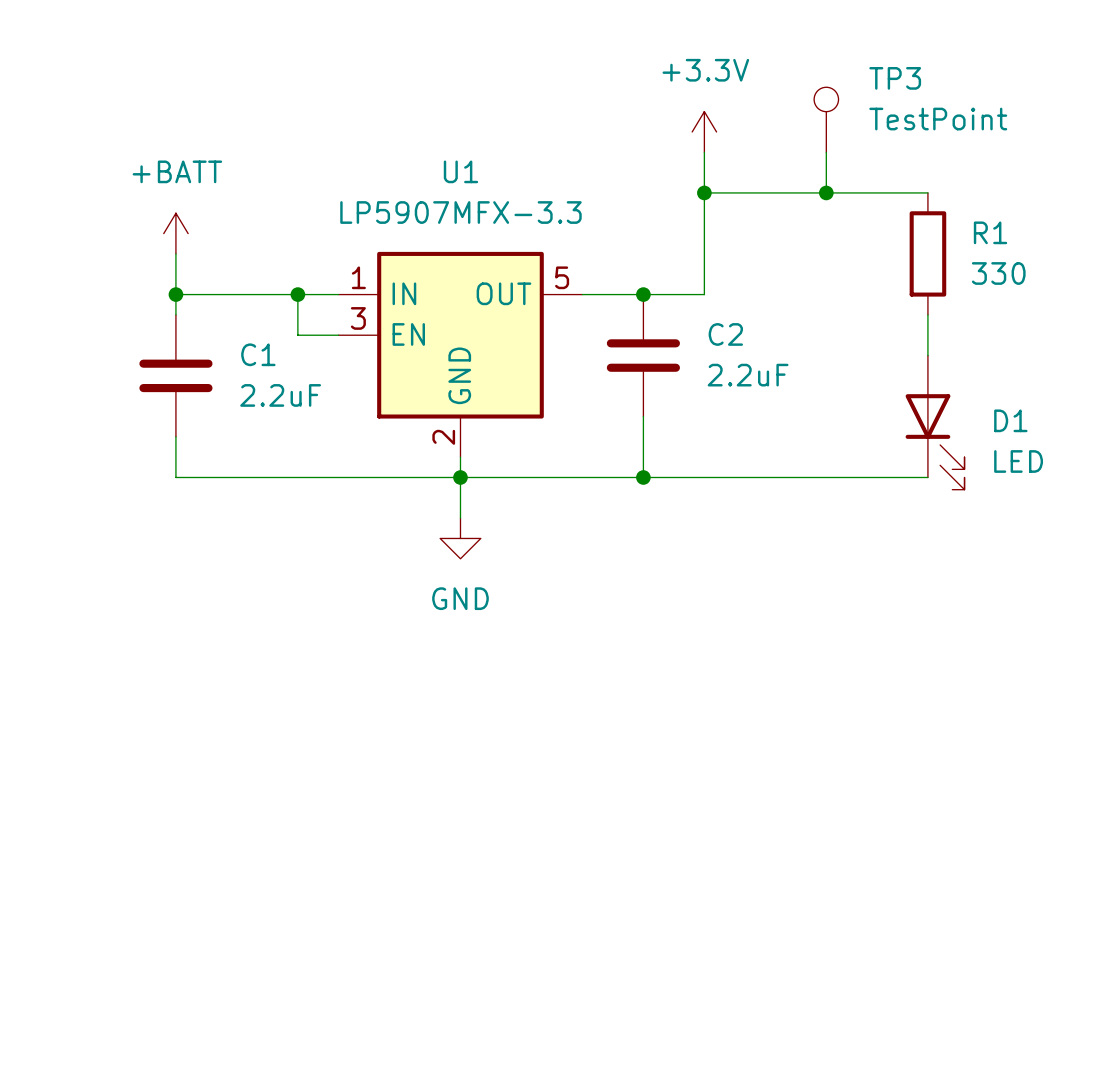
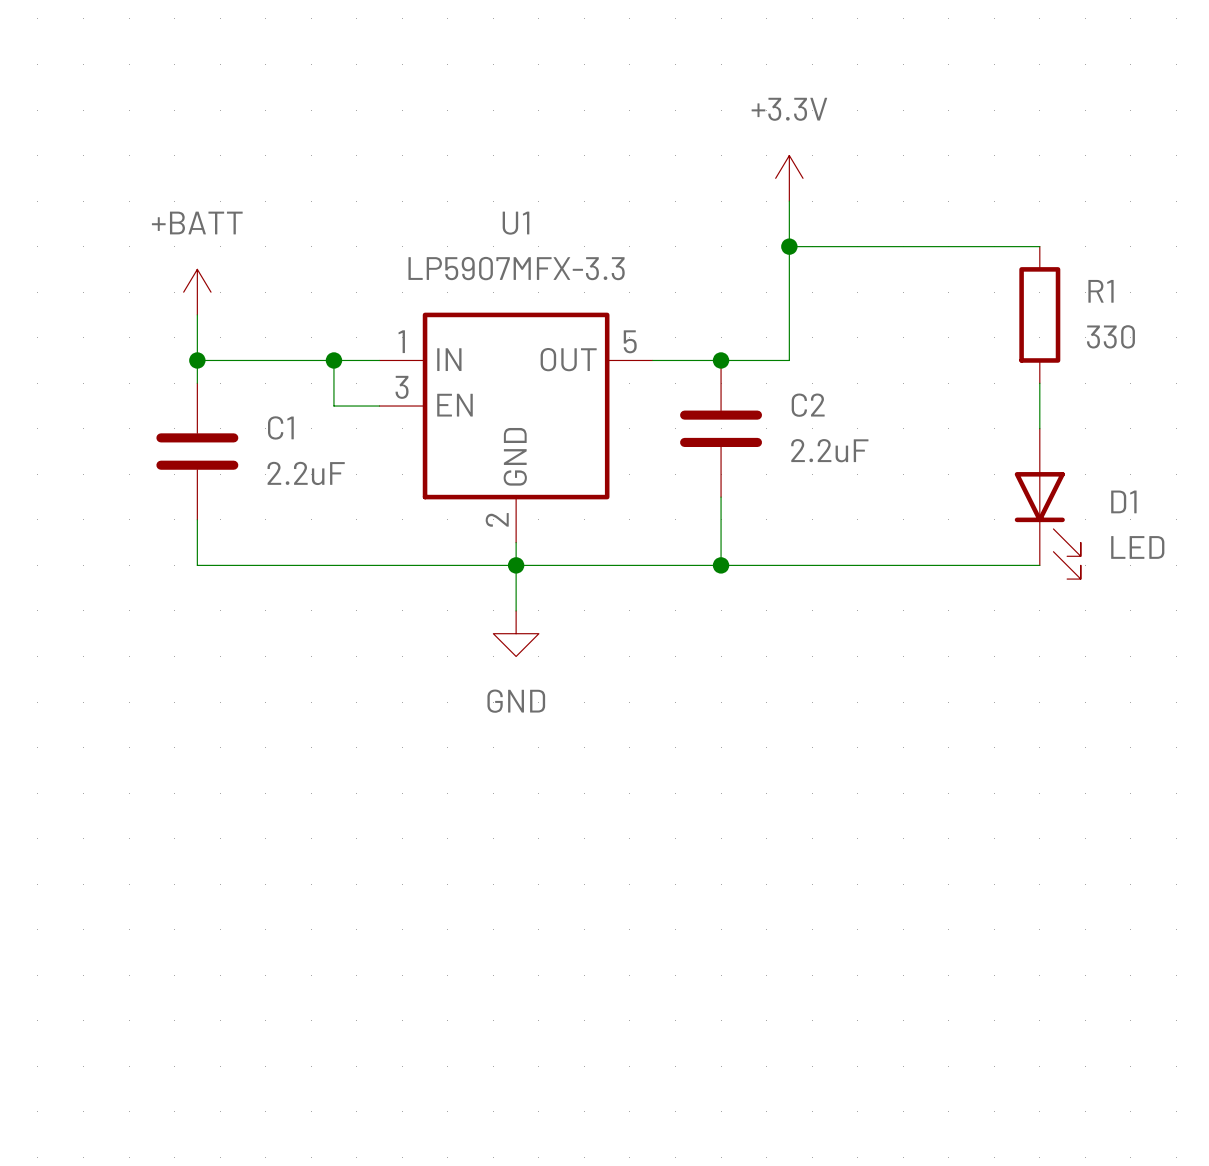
TP3: TestPoint (826, 119) -> none
wire: (826, 152) (826, 192) -> none
junction: (826, 192) -> none

